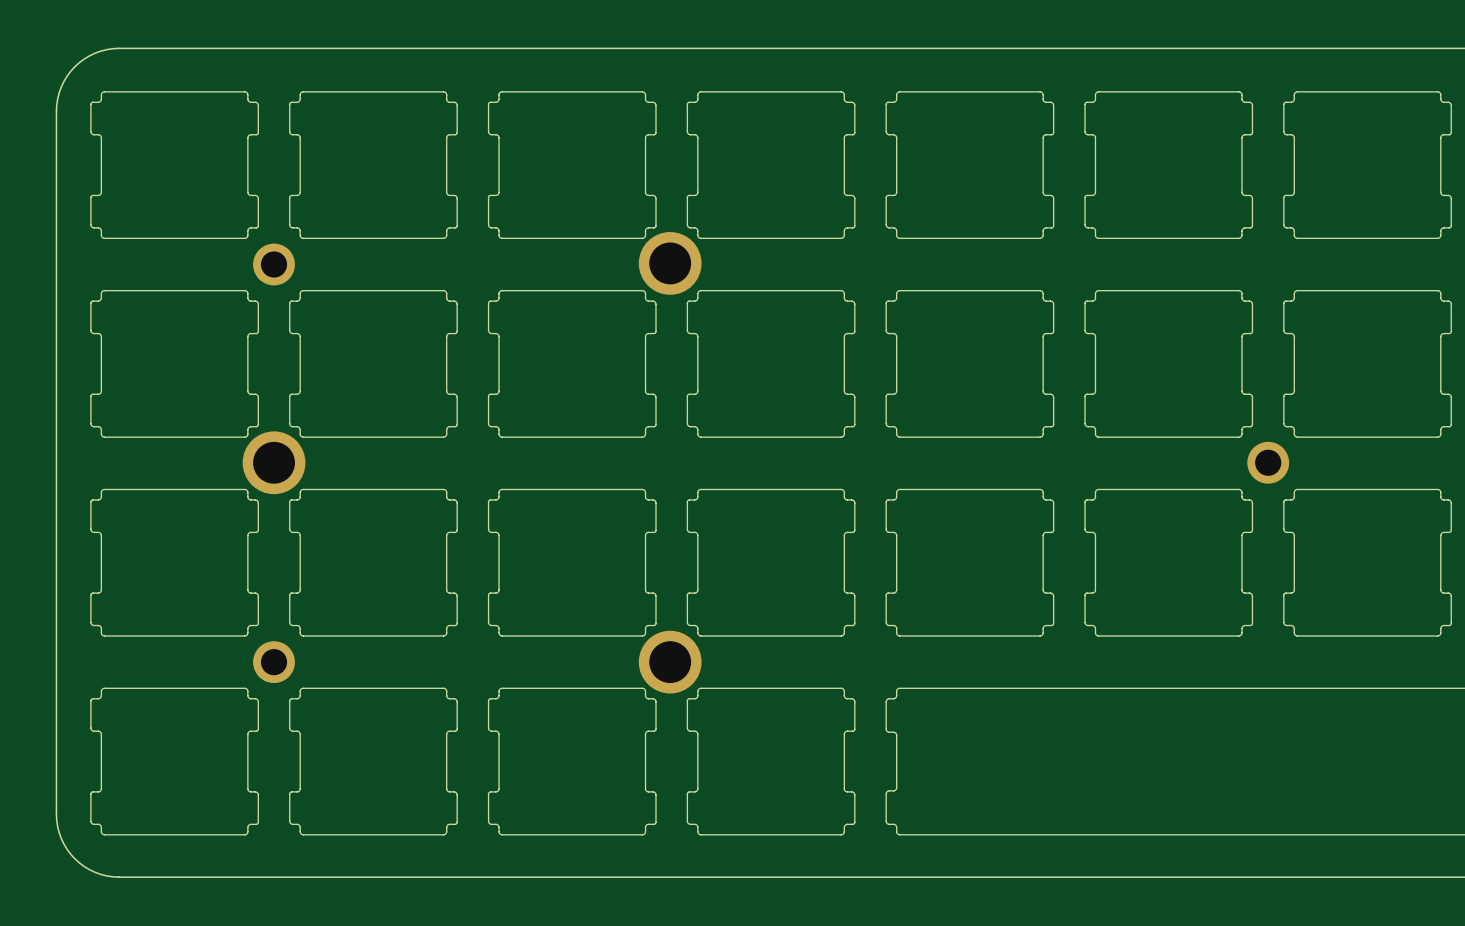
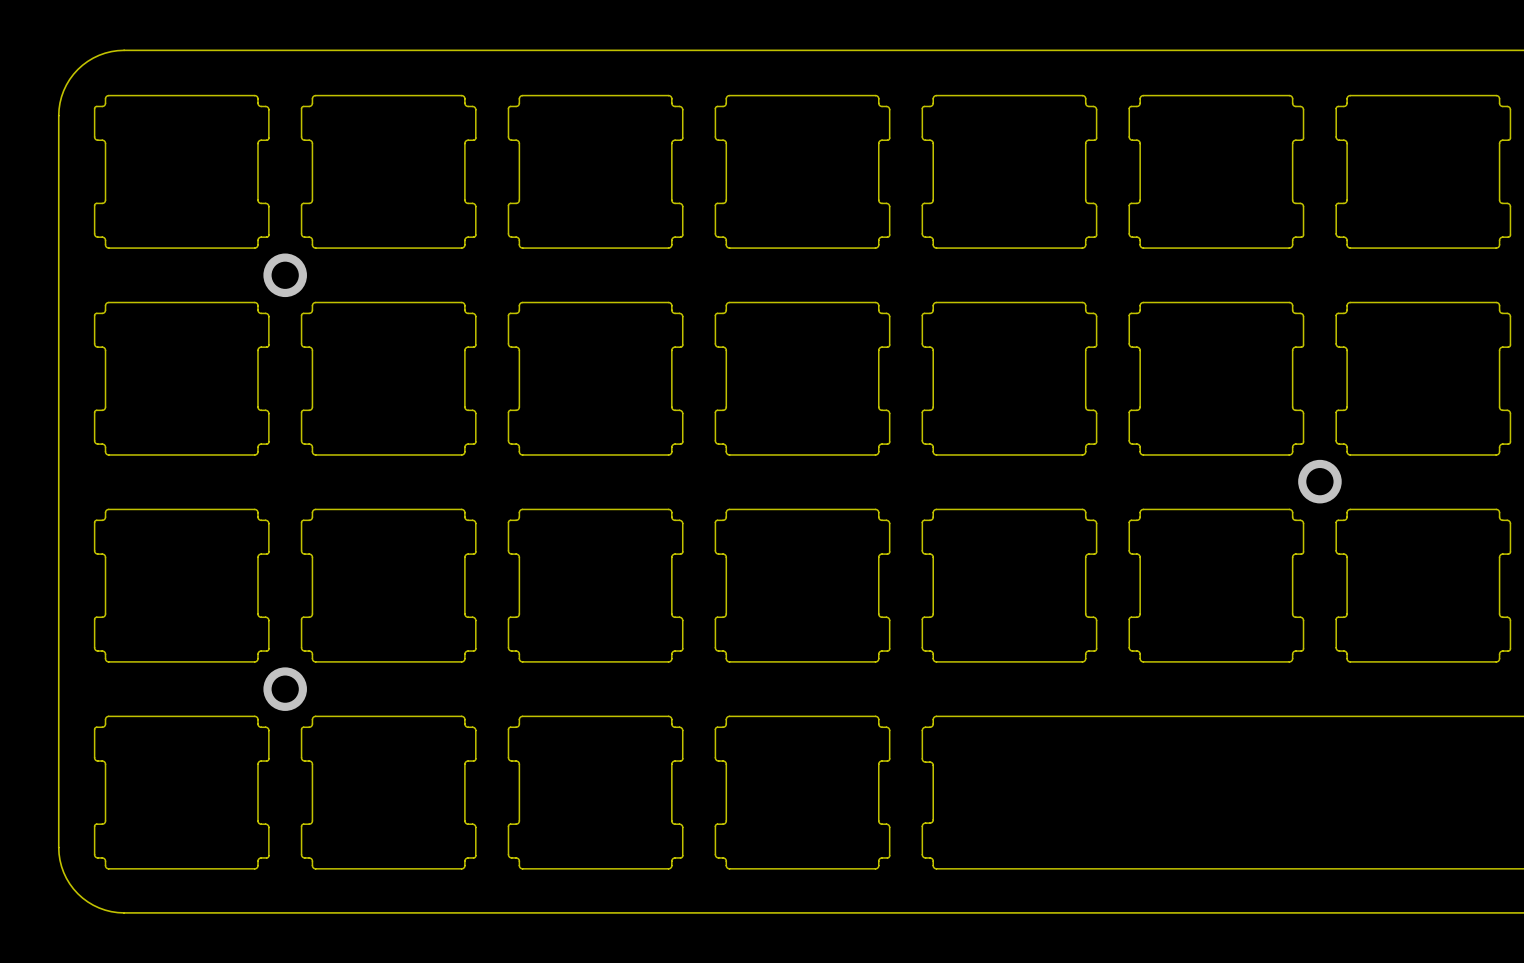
via: (670, 263) -> none
via: (274, 462) -> none
via: (670, 662) -> none

